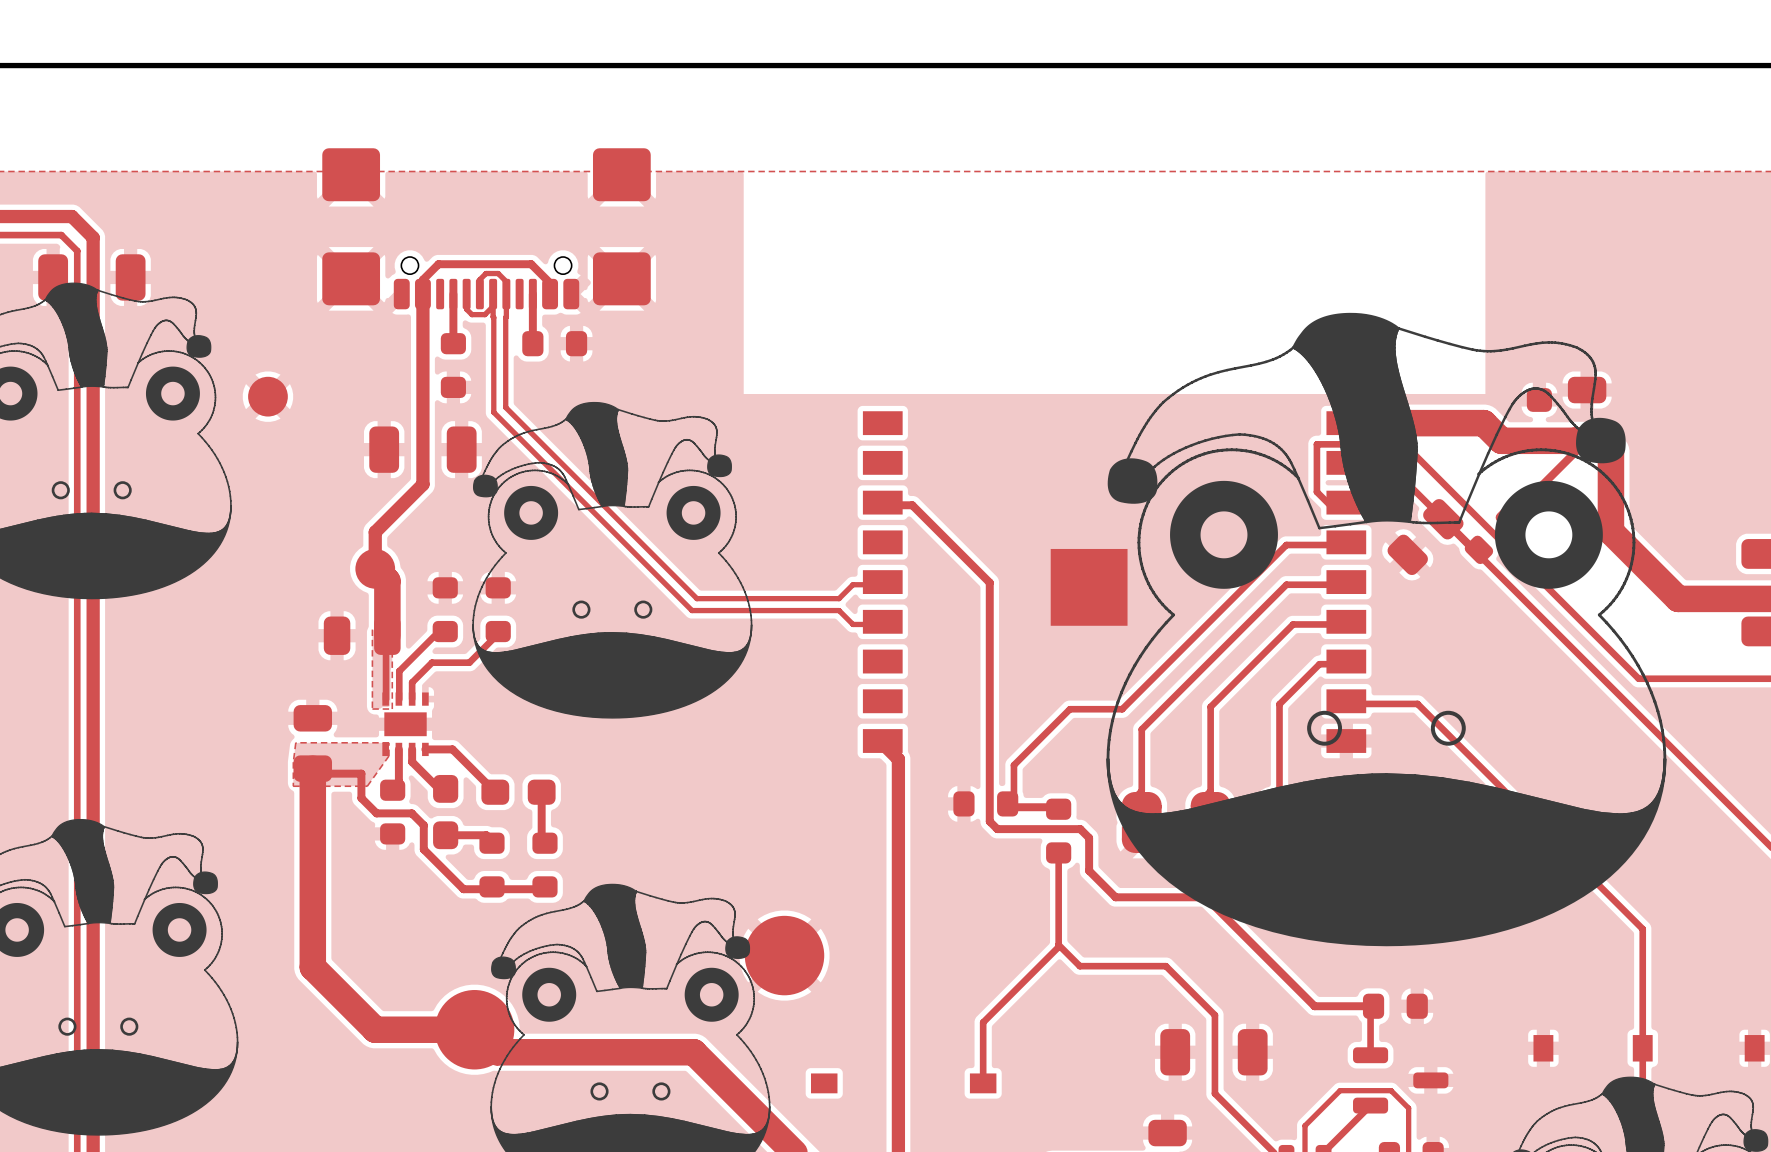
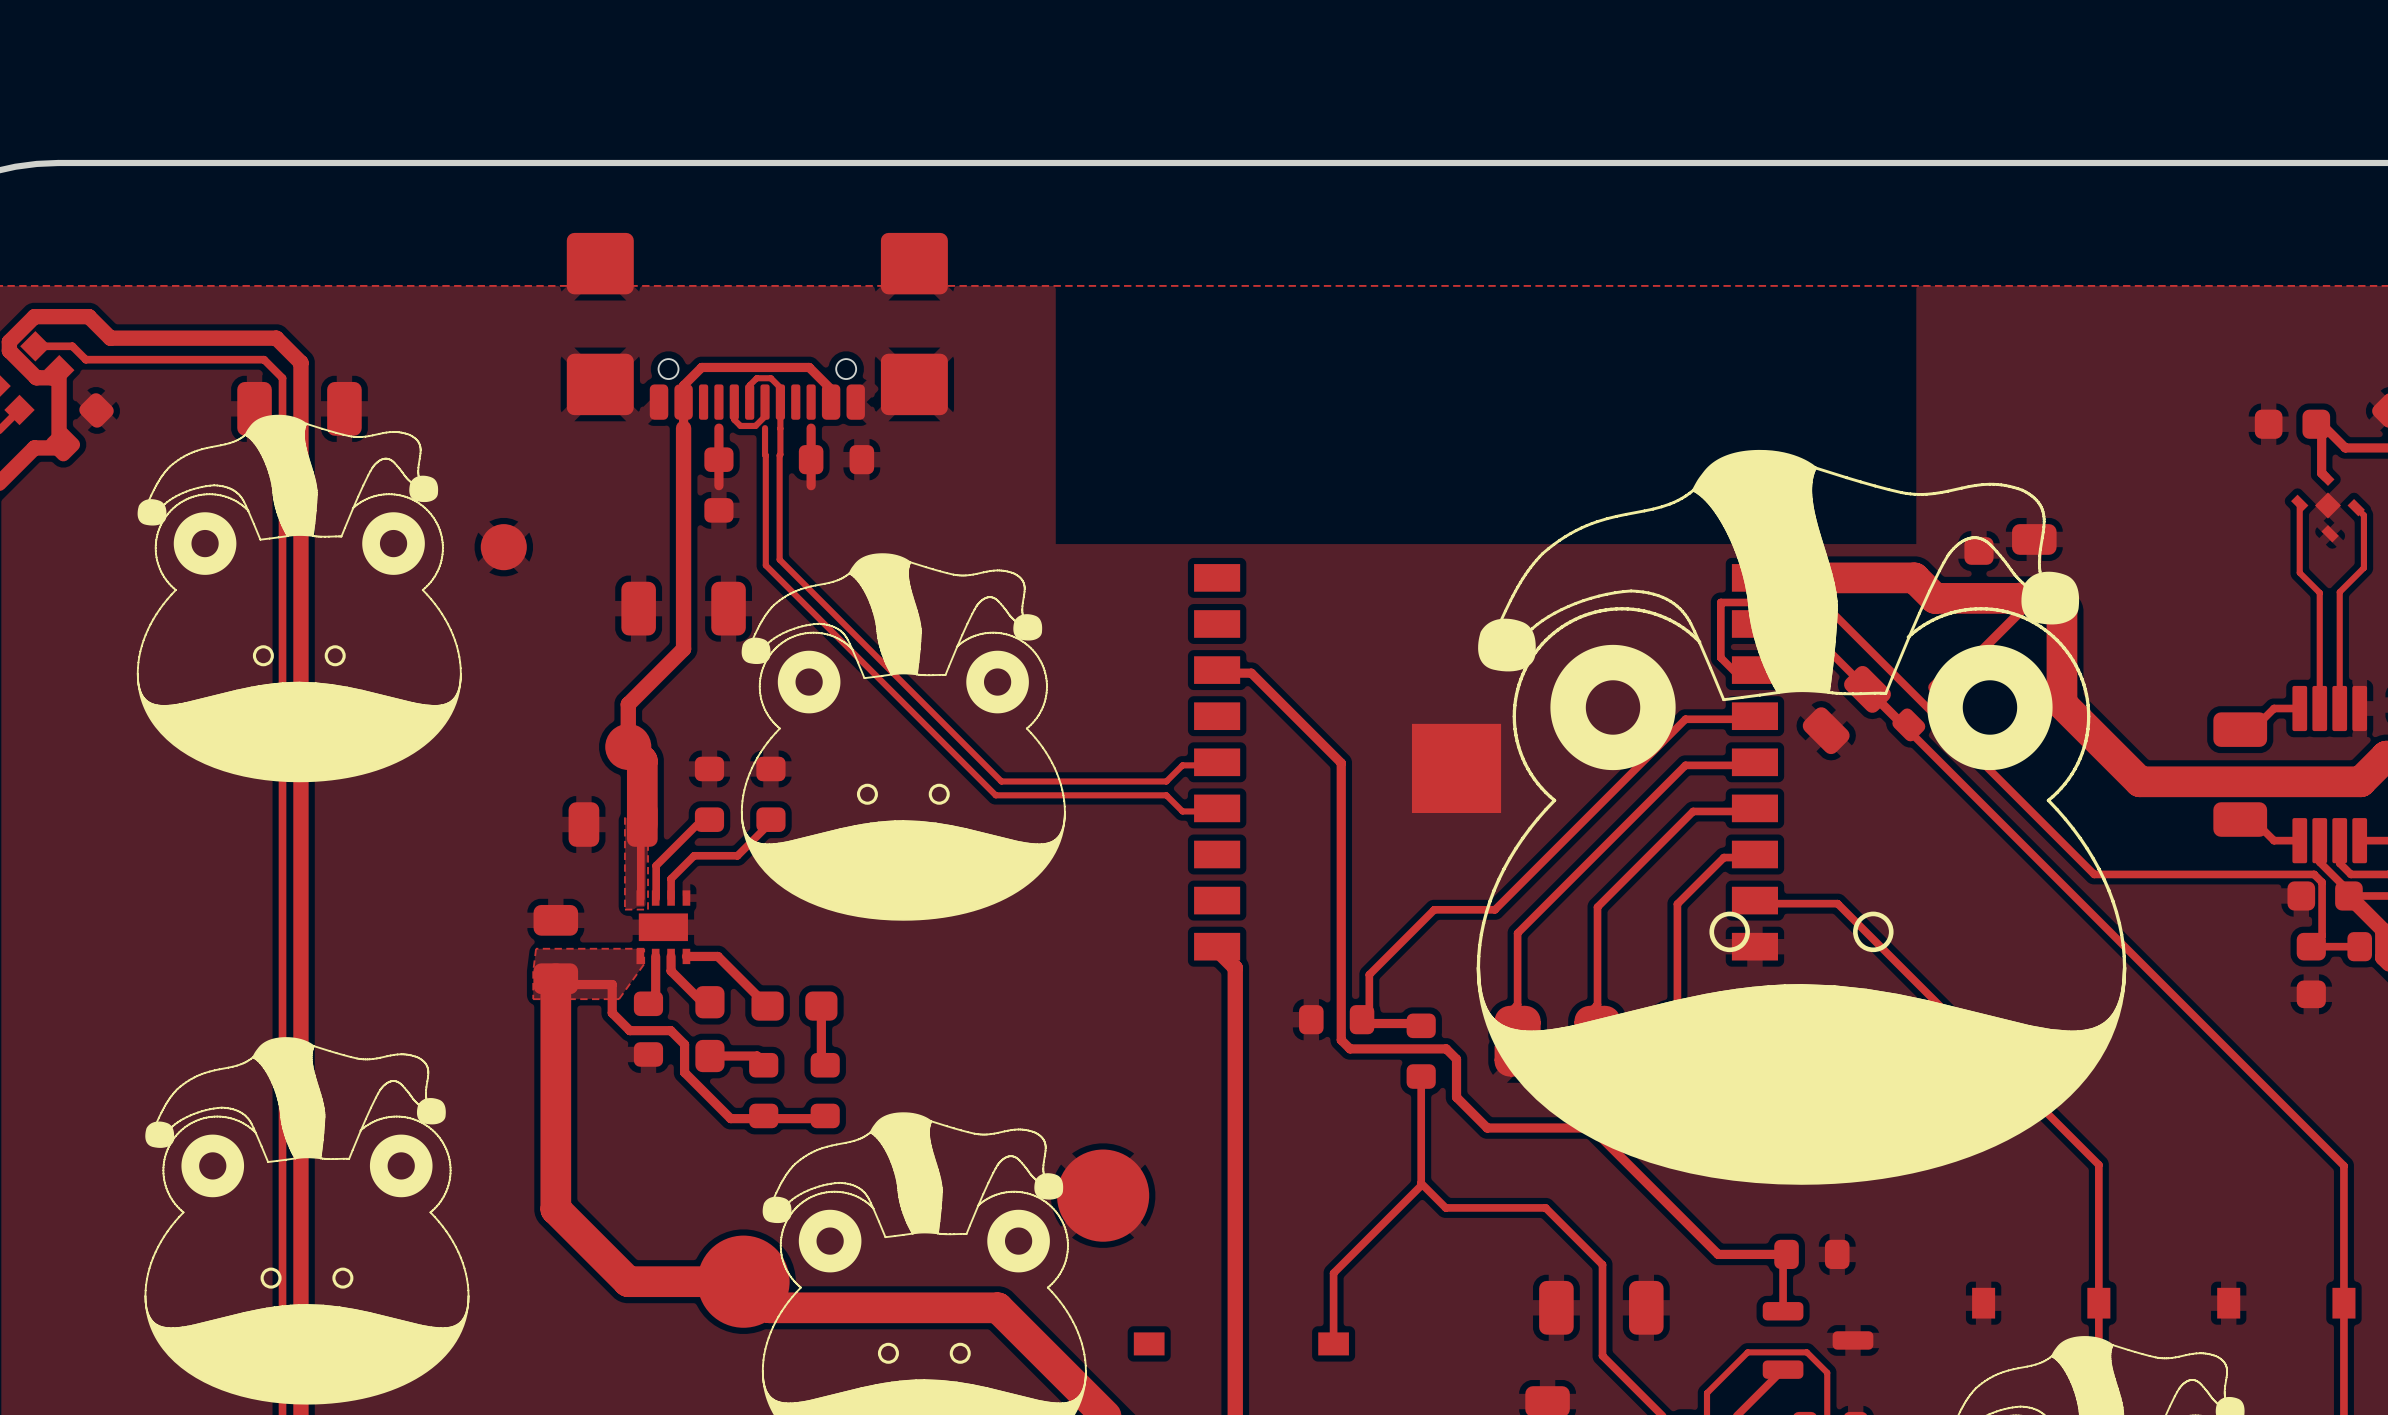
part position: (486, 228) -> (757, 326)
top track: (422, 279) (438, 264) (531, 264) (550, 283) (550, 294) -> (683, 411) (683, 385) (701, 367) (809, 367) (831, 389) (831, 402)
top track: (506, 281) (498, 273) (486, 273) (479, 279) (479, 294) -> (780, 413) (780, 387) (770, 378) (756, 378) (749, 385) (749, 402)
top track: (466, 294) (466, 309) (471, 314) (484, 314) (493, 306) -> (734, 402) (734, 419) (740, 425) (755, 425) (765, 416)
part position: (554, 343) -> (836, 459)
part position: (453, 365) -> (718, 485)

